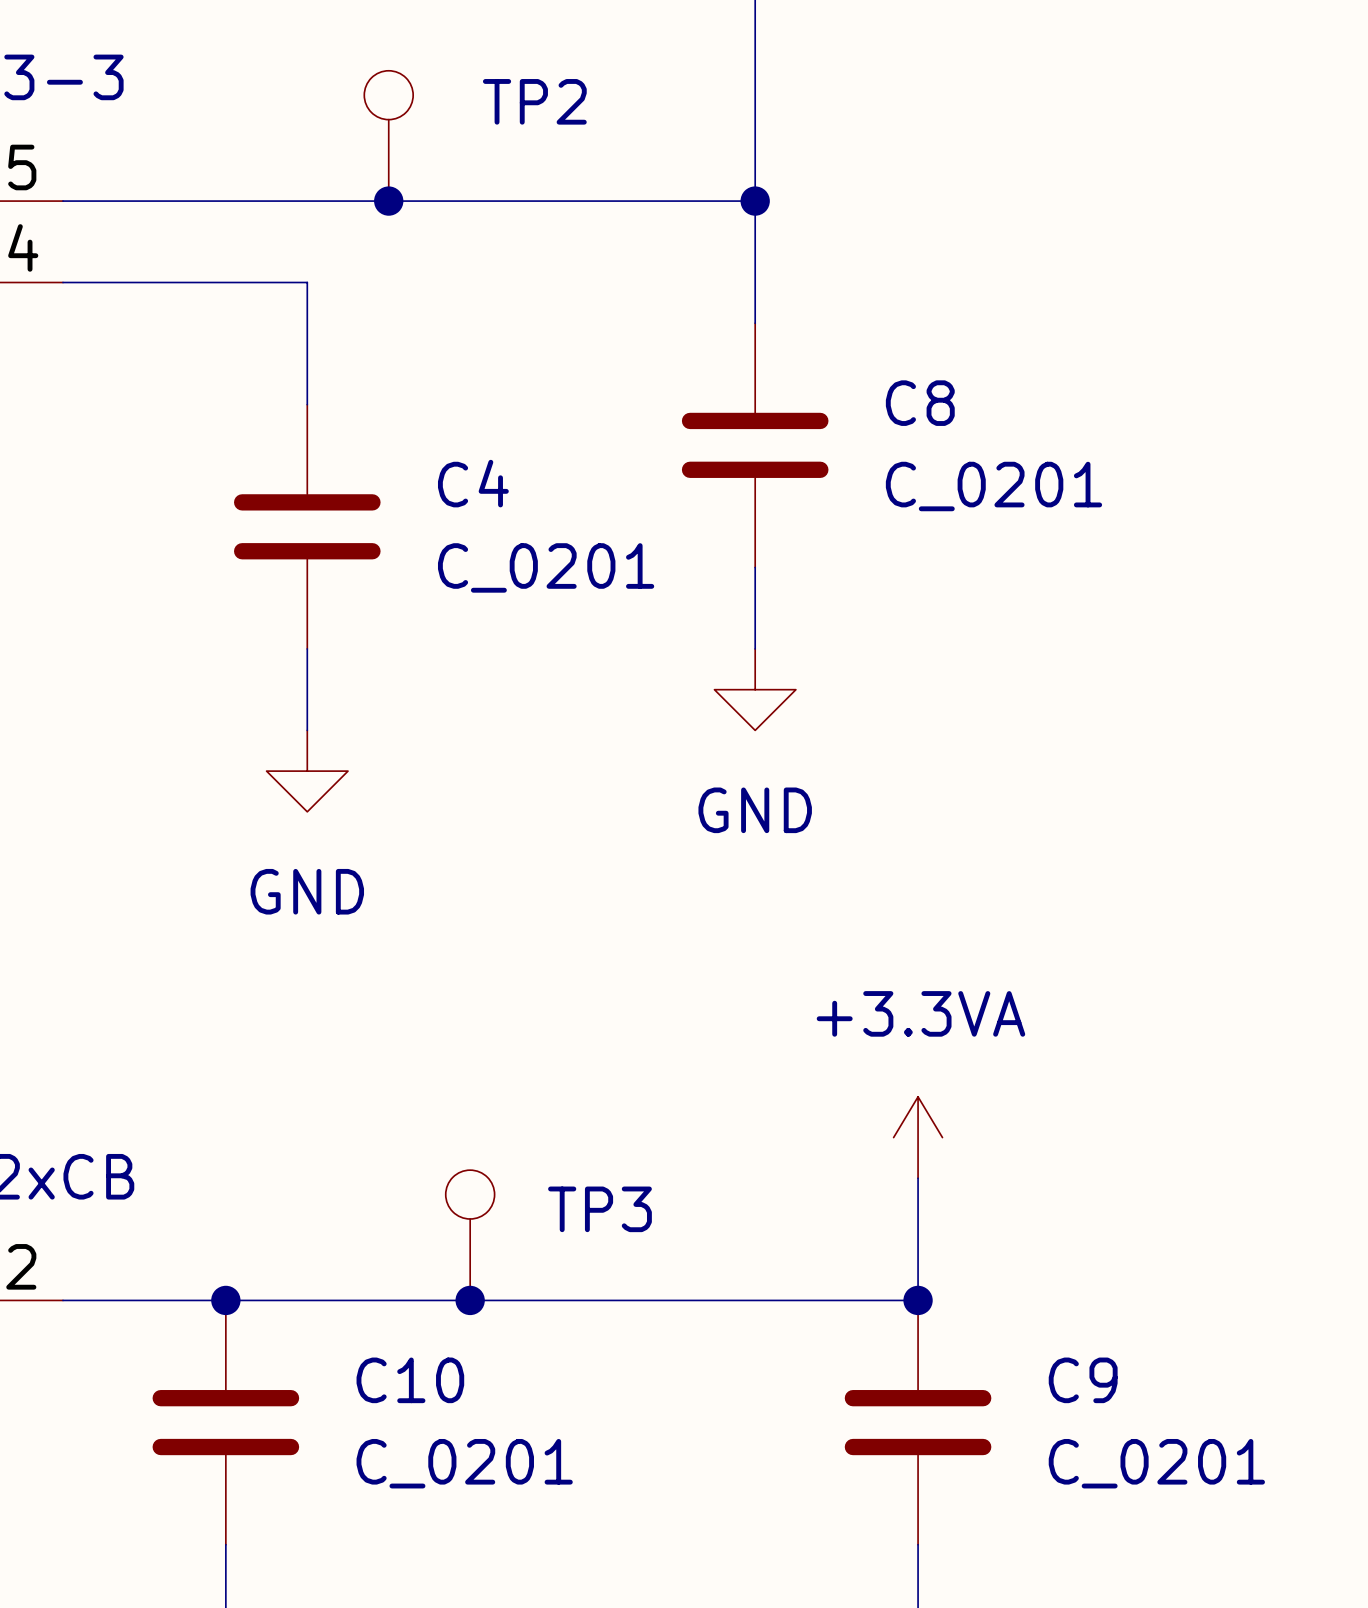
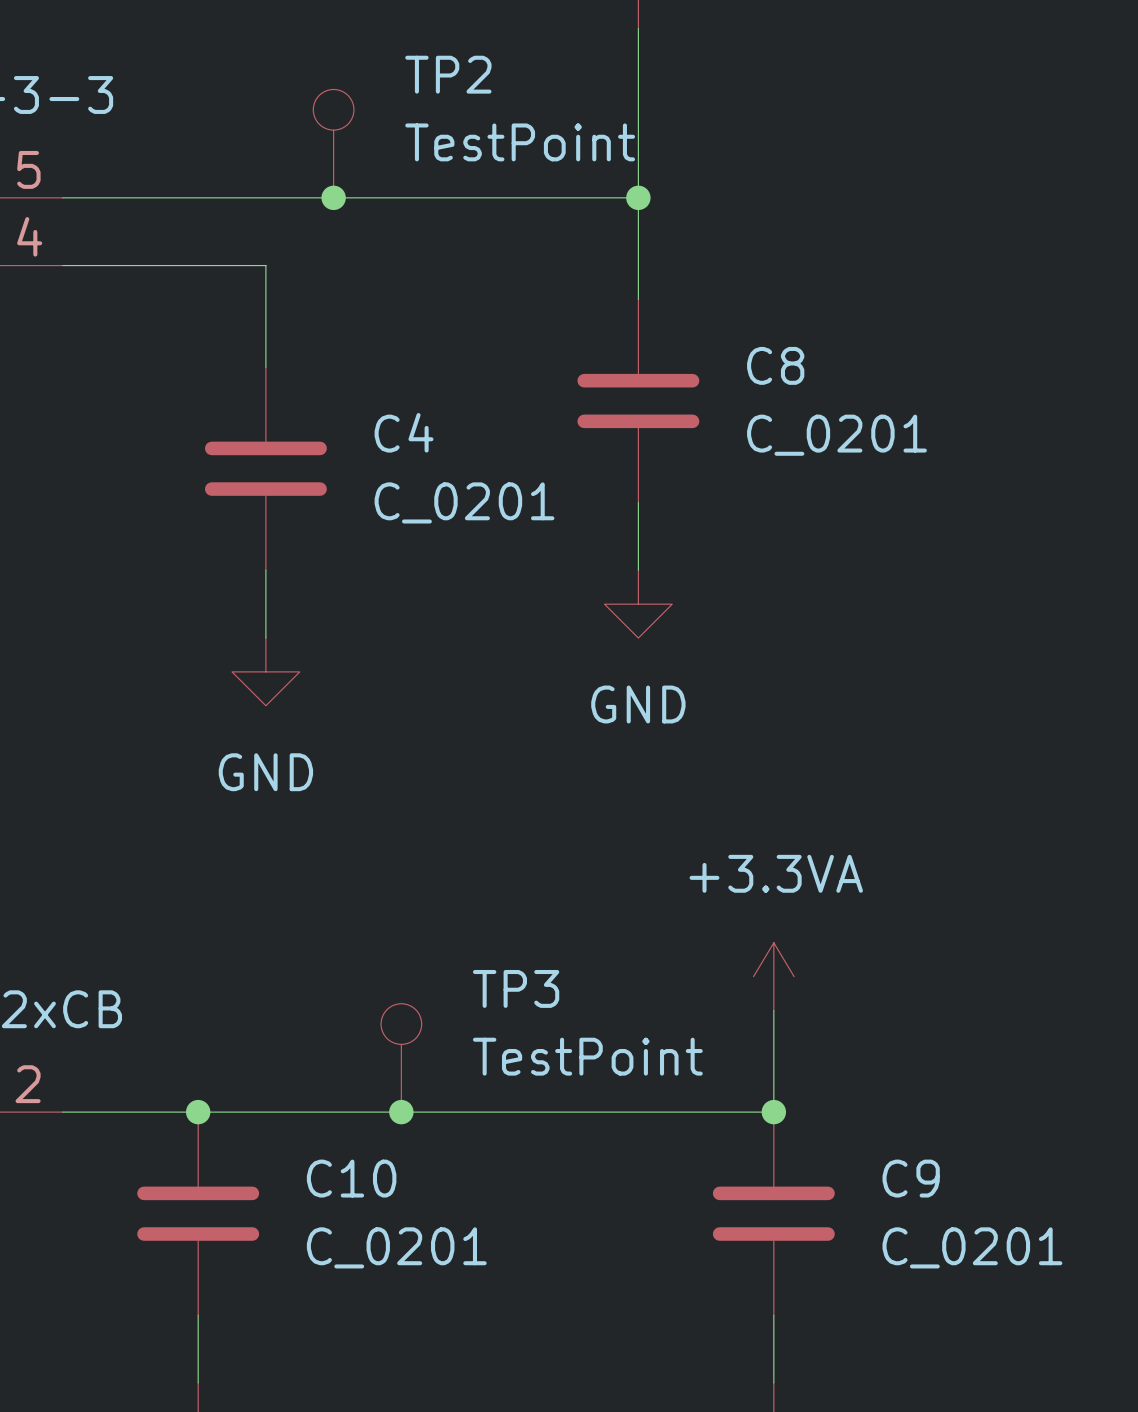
TP2 name position: TP2 (534, 101) -> TP2 (448, 74)
TP2 value: none -> TestPoint (520, 142)
TP3 name position: TP3 (599, 1209) -> TP3 (516, 988)
TP3 value: none -> TestPoint (587, 1056)

